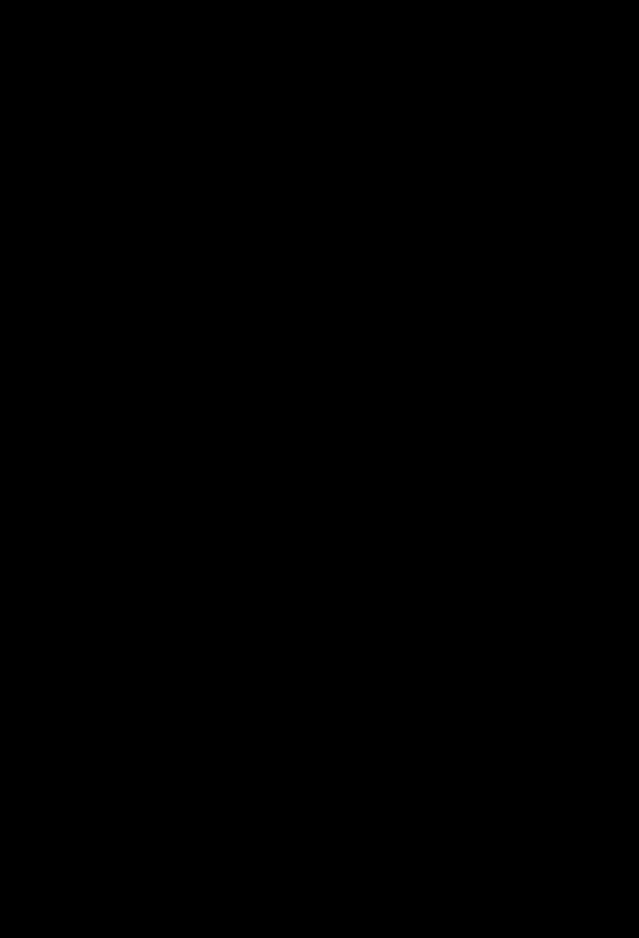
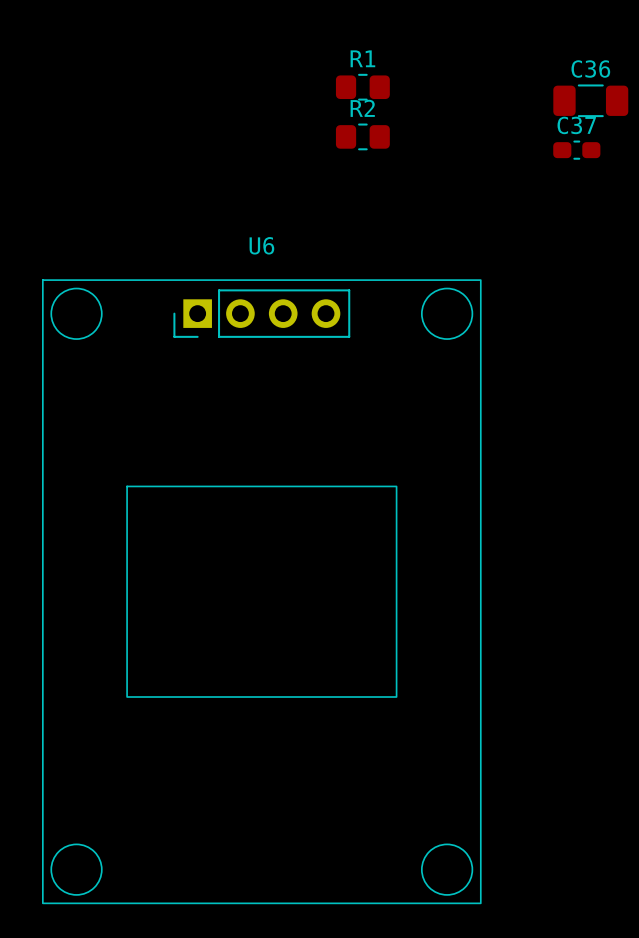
R1: none -> (362, 87)
C36: none -> (590, 100)
R2: none -> (362, 136)
C37: none -> (576, 150)
U6: none -> (261, 591)

